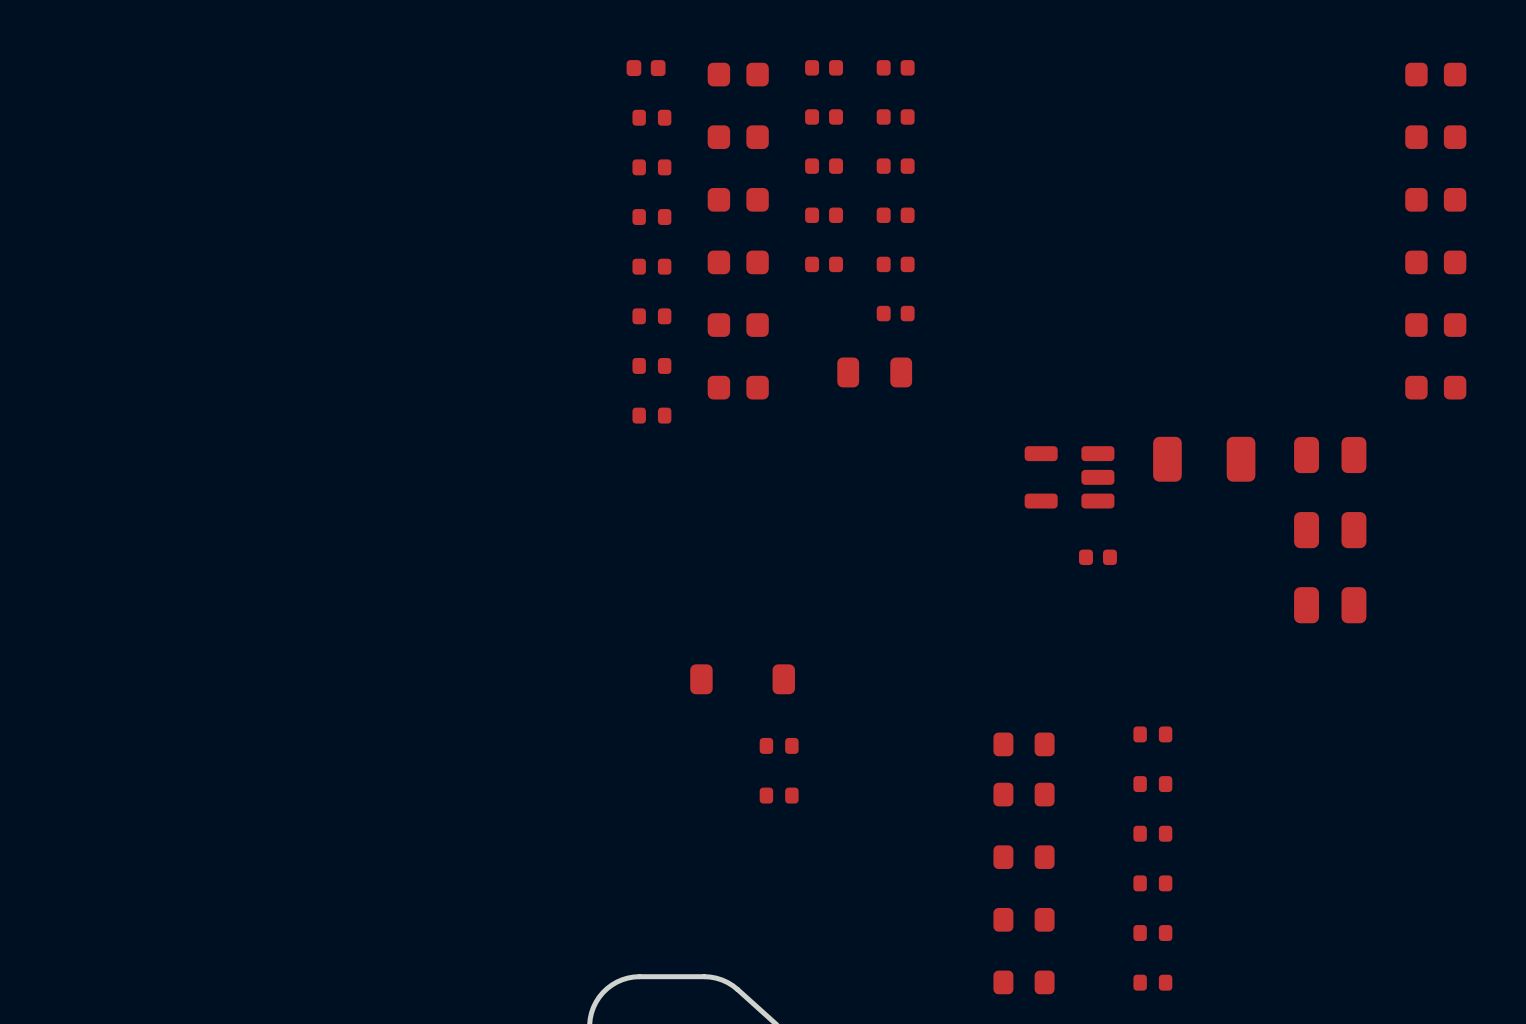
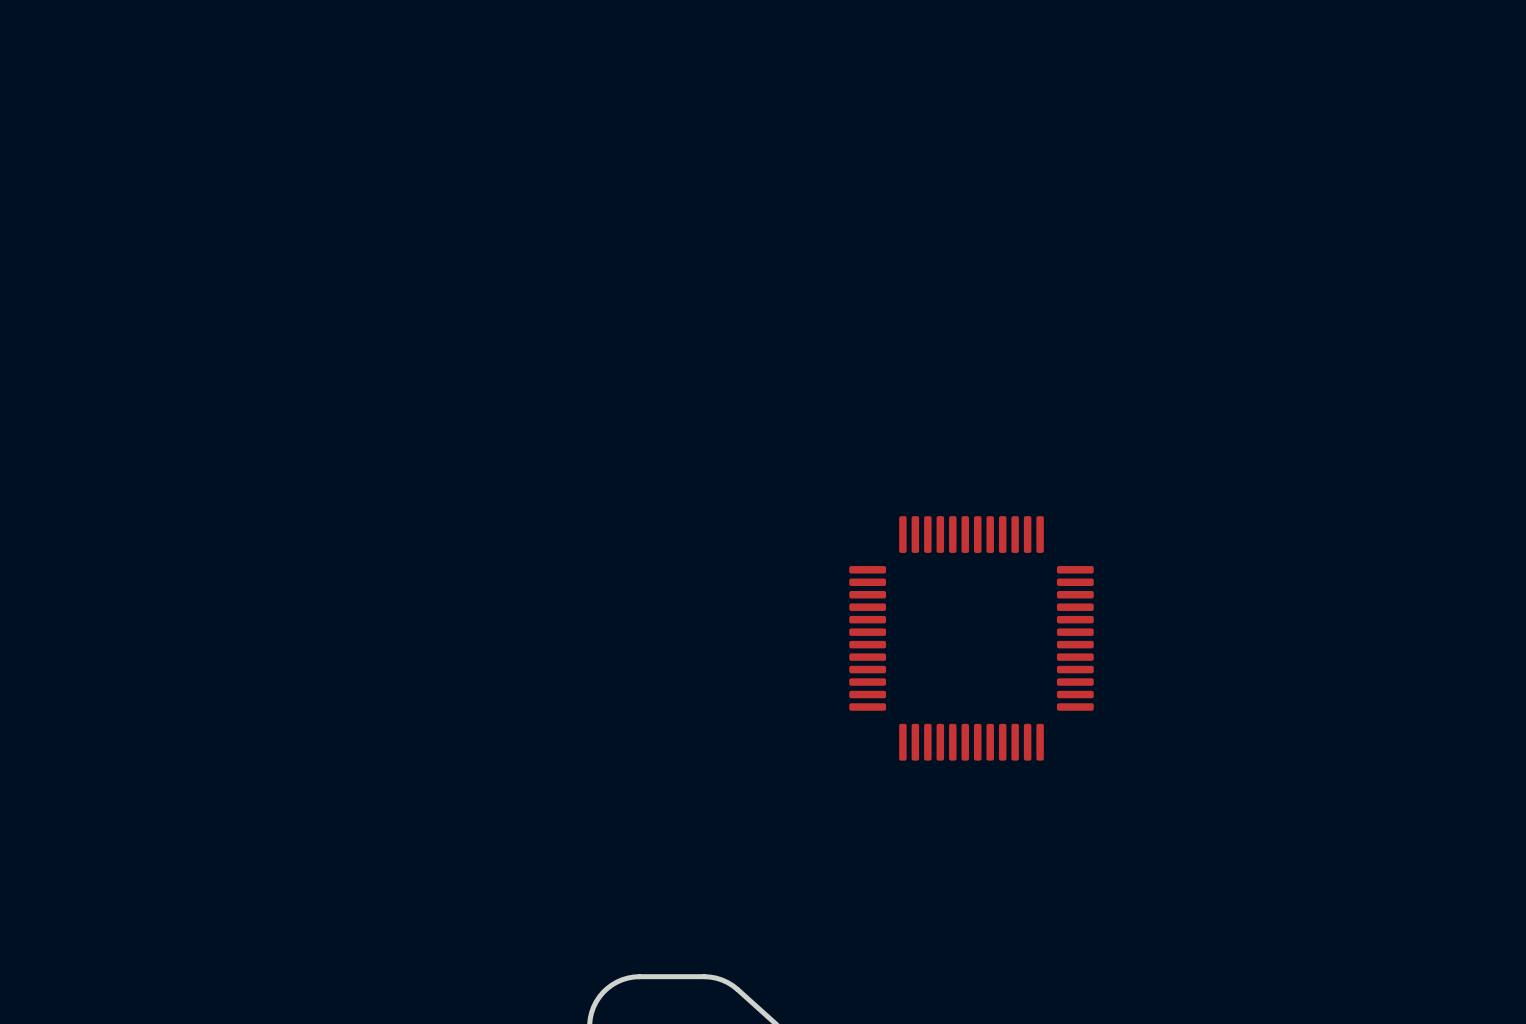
part: (824, 67) -> none
part: (895, 67) -> none
part: (646, 68) -> none
part: (738, 74) -> none
part: (1435, 74) -> none
part: (824, 116) -> none
part: (895, 116) -> none
part: (651, 117) -> none
part: (738, 137) -> none
part: (1435, 137) -> none
part: (824, 166) -> none
part: (895, 166) -> none
part: (651, 167) -> none
part: (738, 199) -> none
part: (1435, 199) -> none
part: (824, 215) -> none
part: (895, 215) -> none
part: (651, 217) -> none
part: (738, 262) -> none
part: (1435, 262) -> none
part: (824, 264) -> none
part: (895, 264) -> none
part: (651, 266) -> none
part: (895, 313) -> none
part: (651, 316) -> none
part: (738, 325) -> none
part: (1435, 325) -> none
part: (651, 365) -> none
part: (874, 372) -> none
part: (738, 387) -> none
part: (1435, 387) -> none
part: (651, 415) -> none
part: (1330, 455) -> none
part: (1204, 459) -> none
part: (1069, 477) -> none
part: (1330, 530) -> none
part: (1097, 557) -> none
part: (1330, 605) -> none
part: none -> (971, 638)
part: (742, 679) -> none
part: (1152, 734) -> none
part: (1024, 744) -> none
part: (779, 745) -> none
part: (1152, 784) -> none
part: (1024, 794) -> none
part: (779, 795) -> none
part: (1152, 833) -> none
part: (1024, 857) -> none
part: (1152, 883) -> none
part: (1024, 919) -> none
part: (1152, 933) -> none
part: (1024, 982) -> none
part: (1152, 982) -> none

